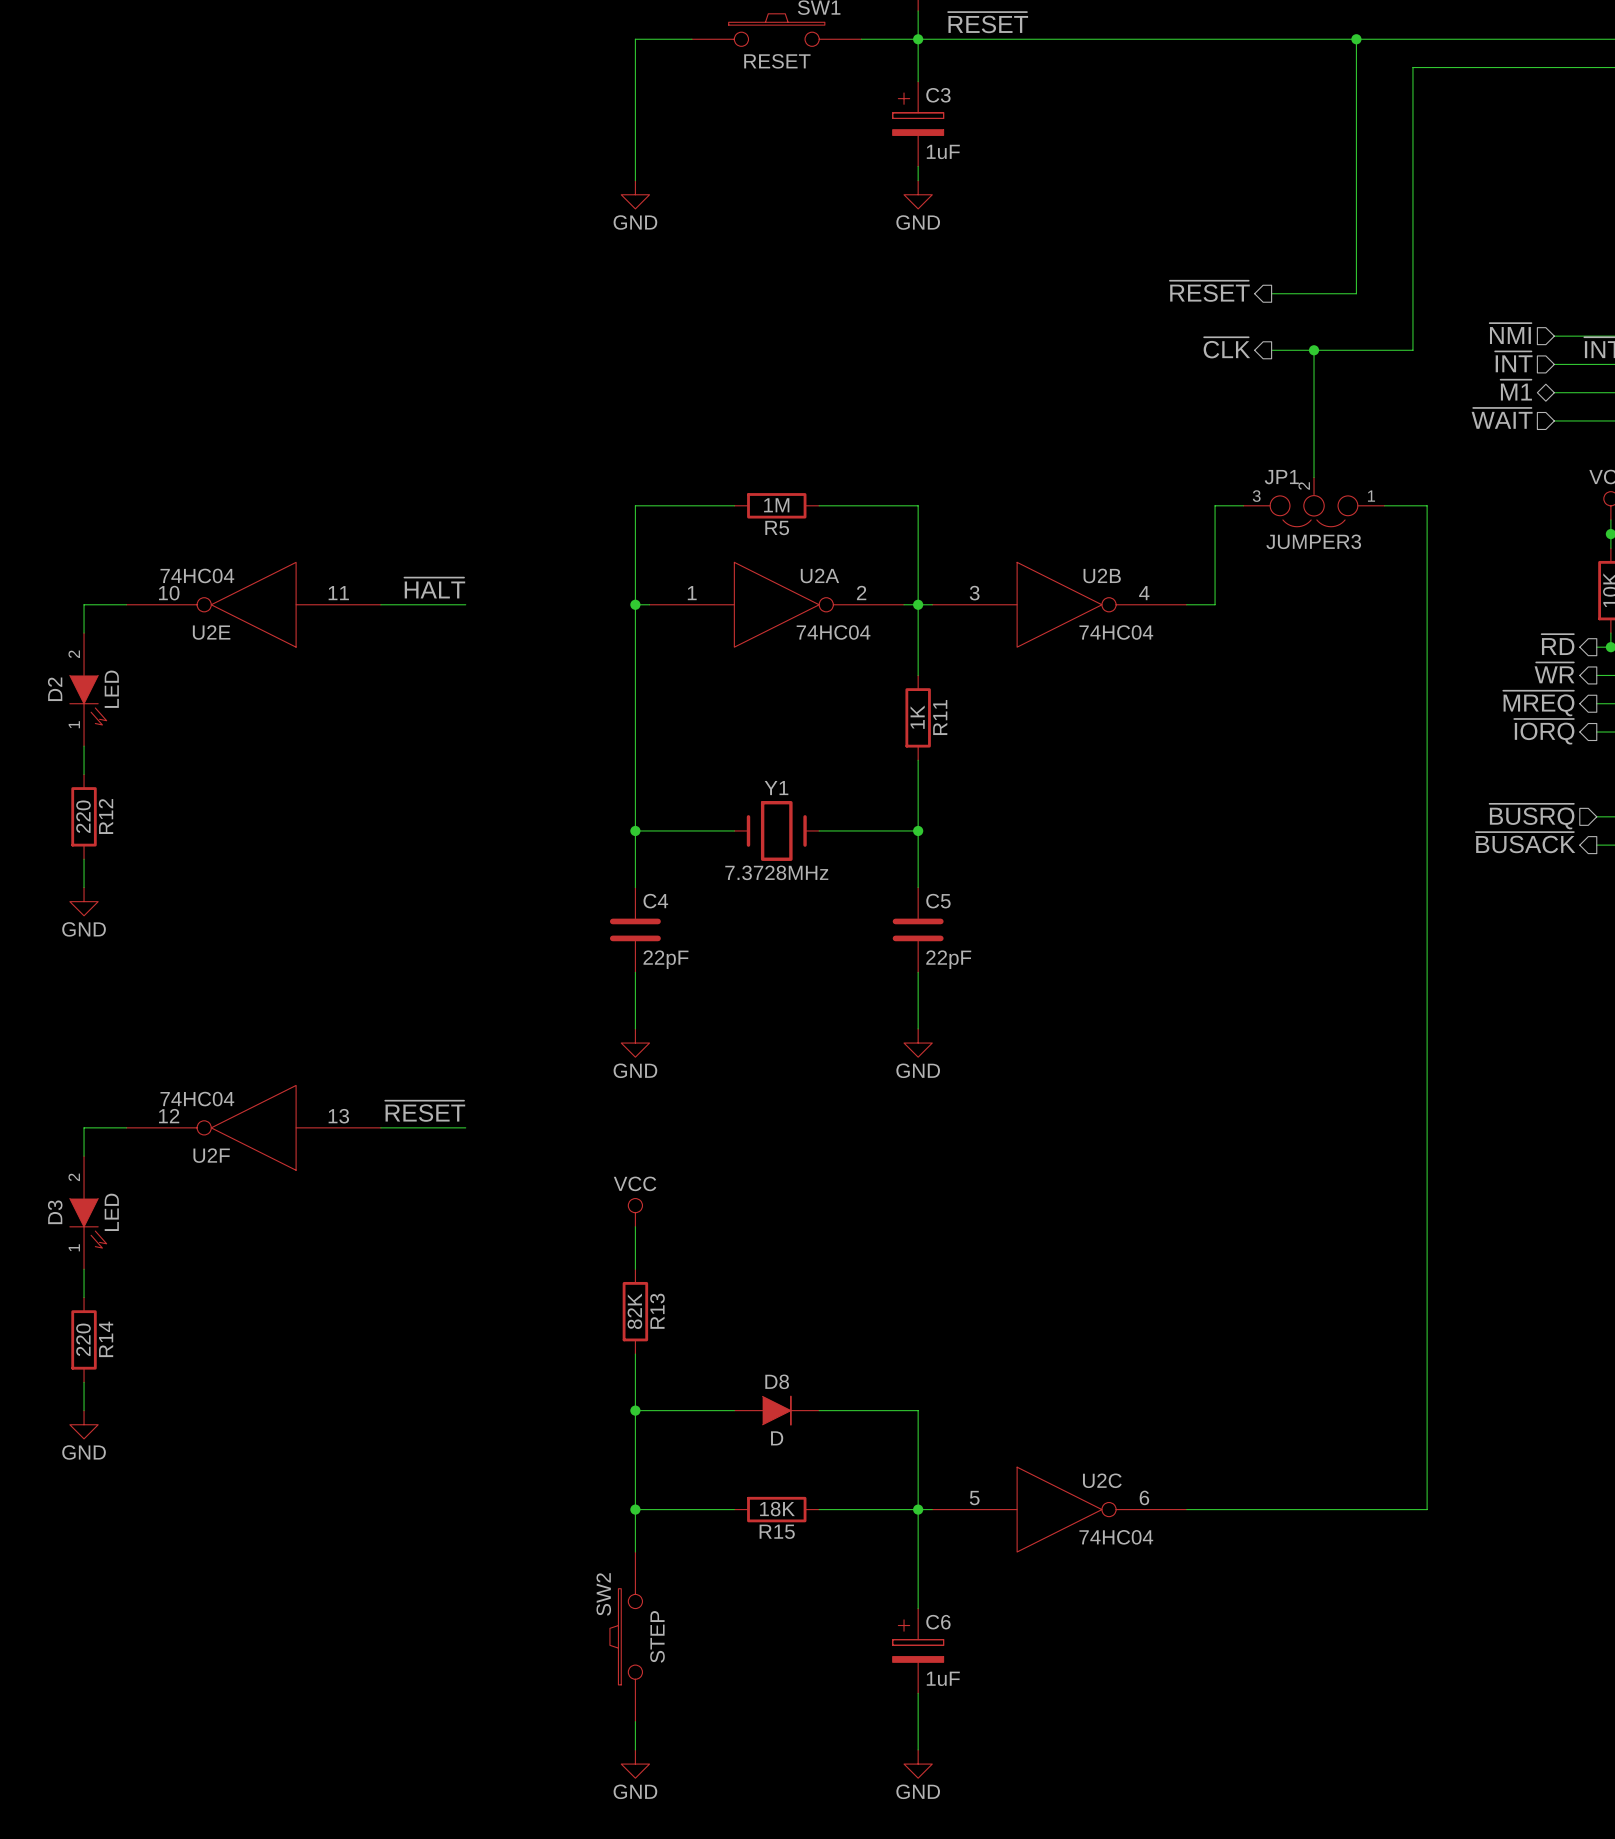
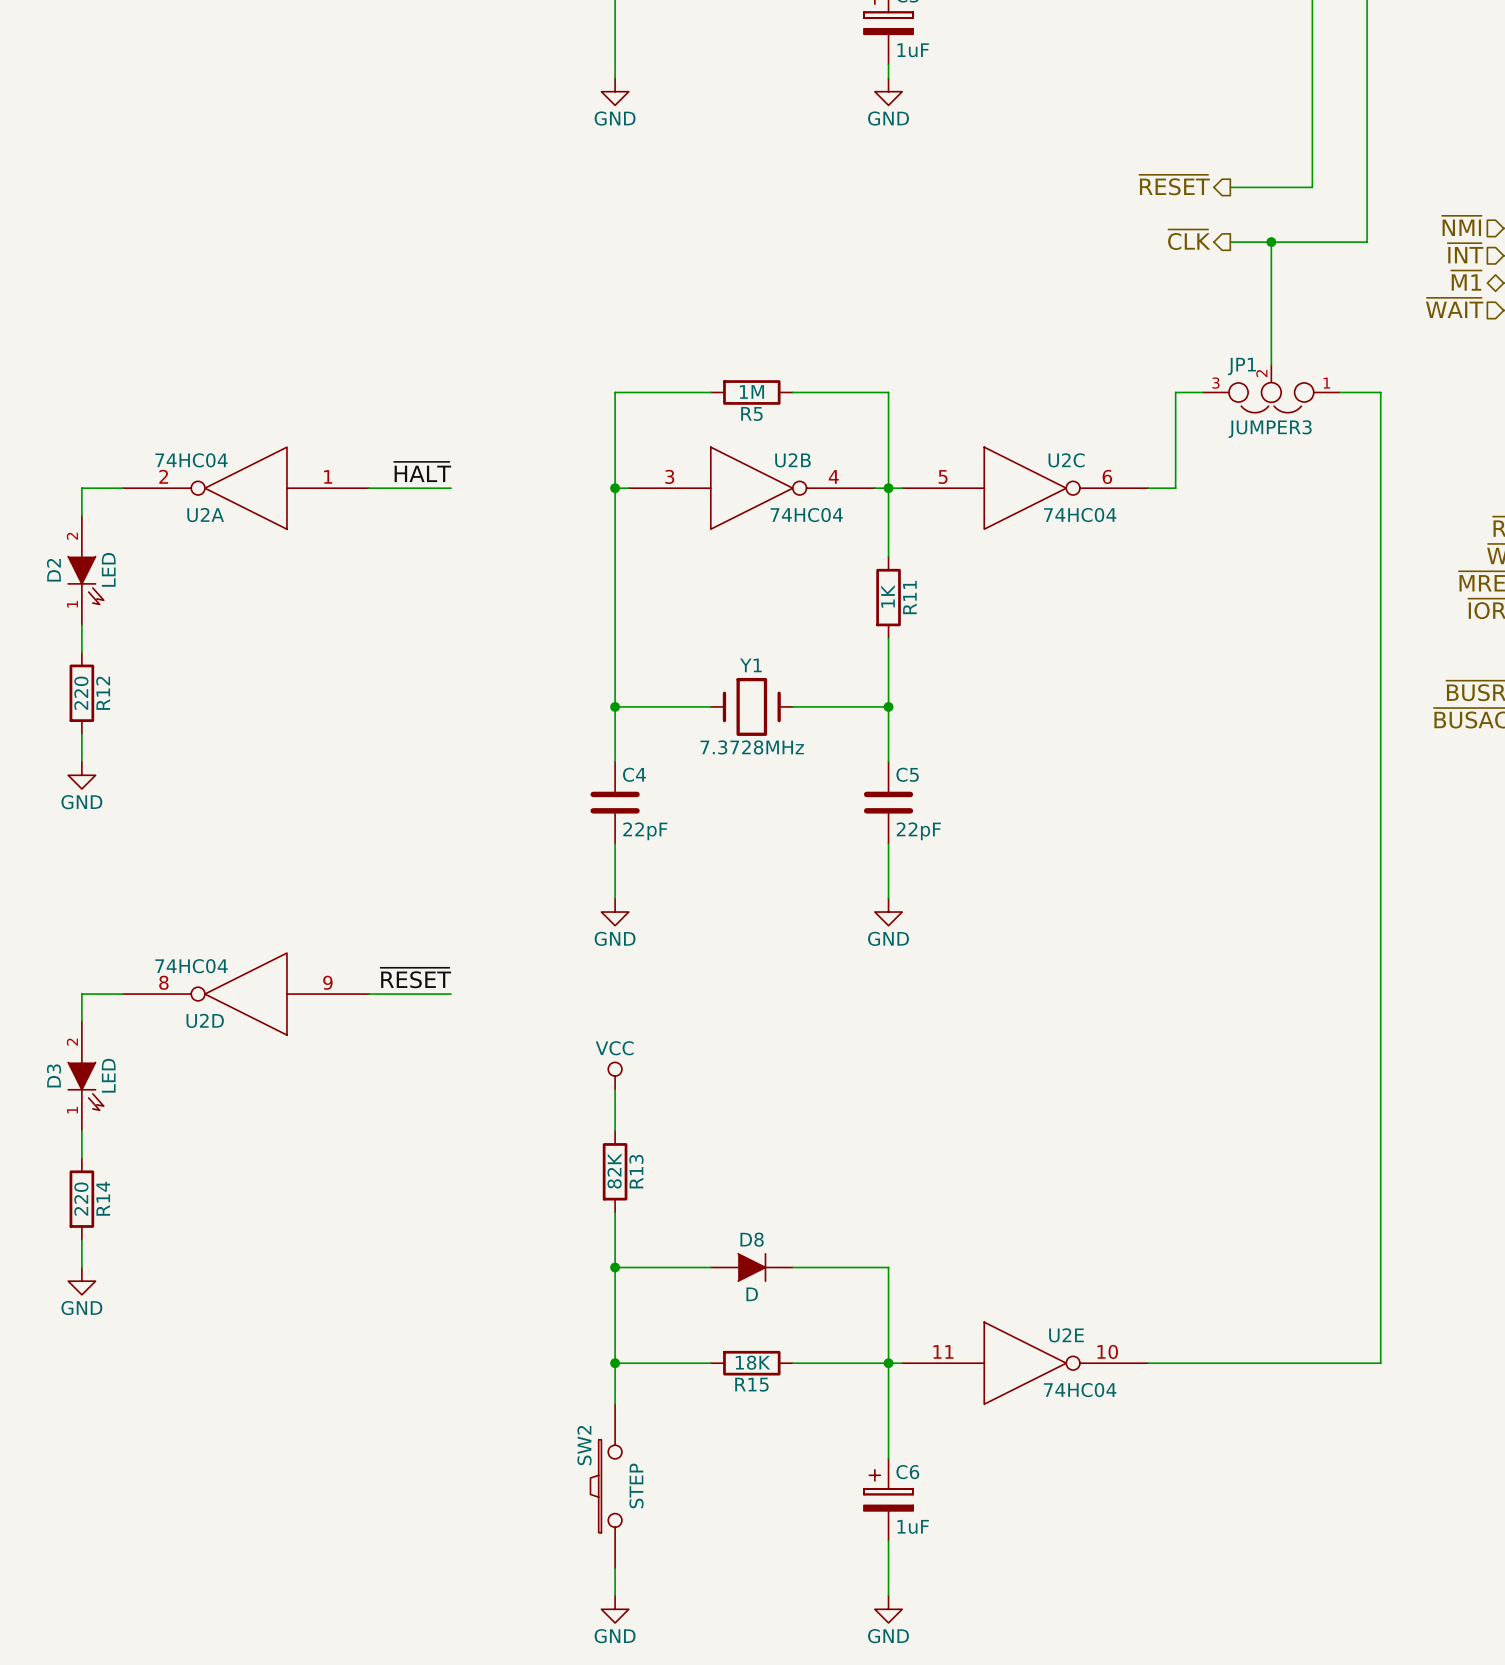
U2E rotation: 0° (253, 604) -> 180° (1025, 1363)
U2E position: (253, 604) -> (1025, 1363)
U2A rotation: 0° (776, 604) -> 180° (245, 488)
U2A position: (776, 604) -> (245, 488)
U2B position: (1059, 604) -> (751, 488)
U2F pin number: 12 (169, 1116) -> 8 (163, 982)
U2F pin number: 13 (338, 1116) -> 9 (327, 982)
U2F name: U2F (211, 1155) -> U2D (205, 1020)
U2C position: (1059, 1509) -> (1025, 488)

